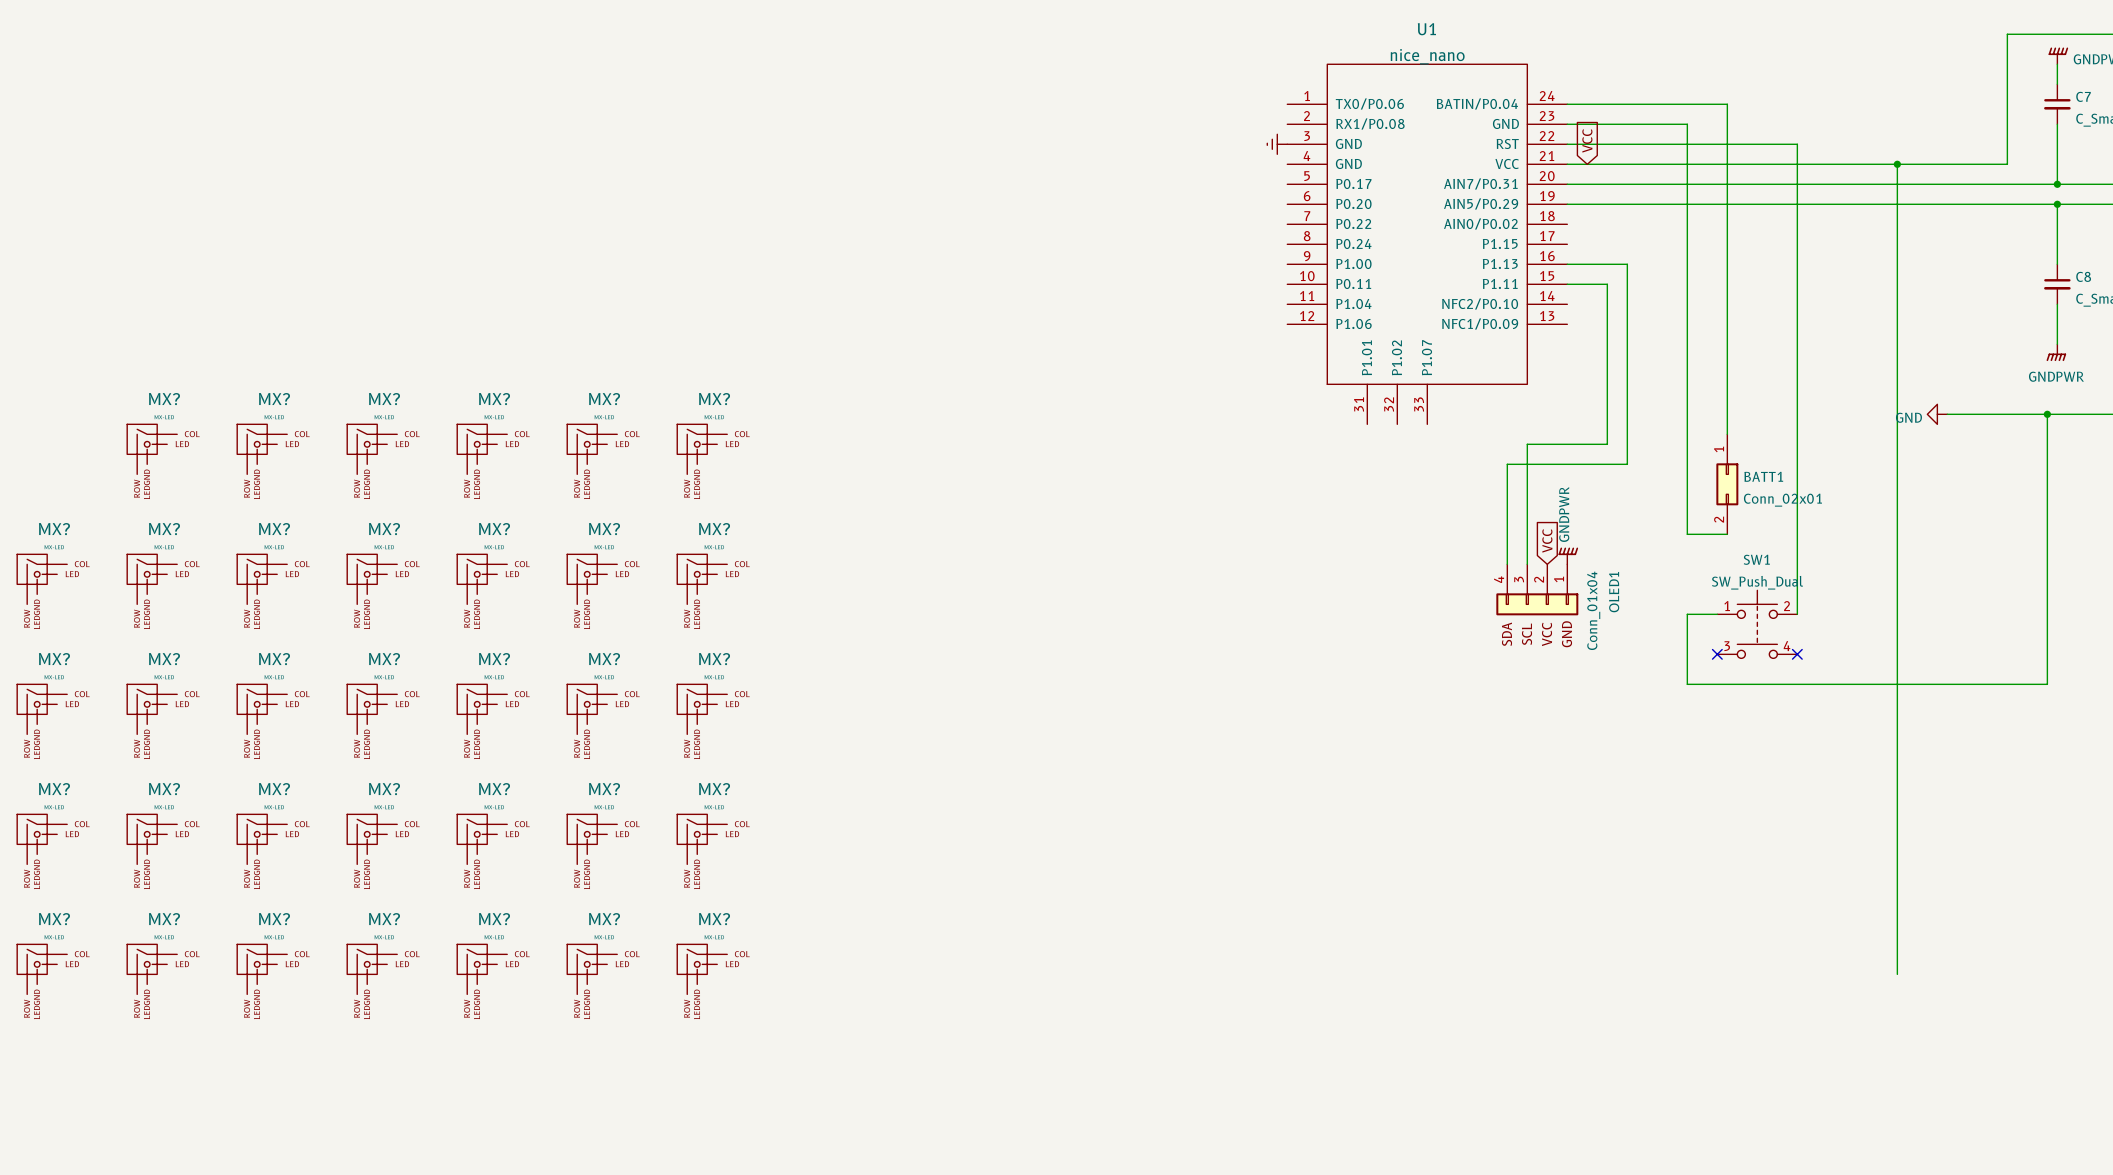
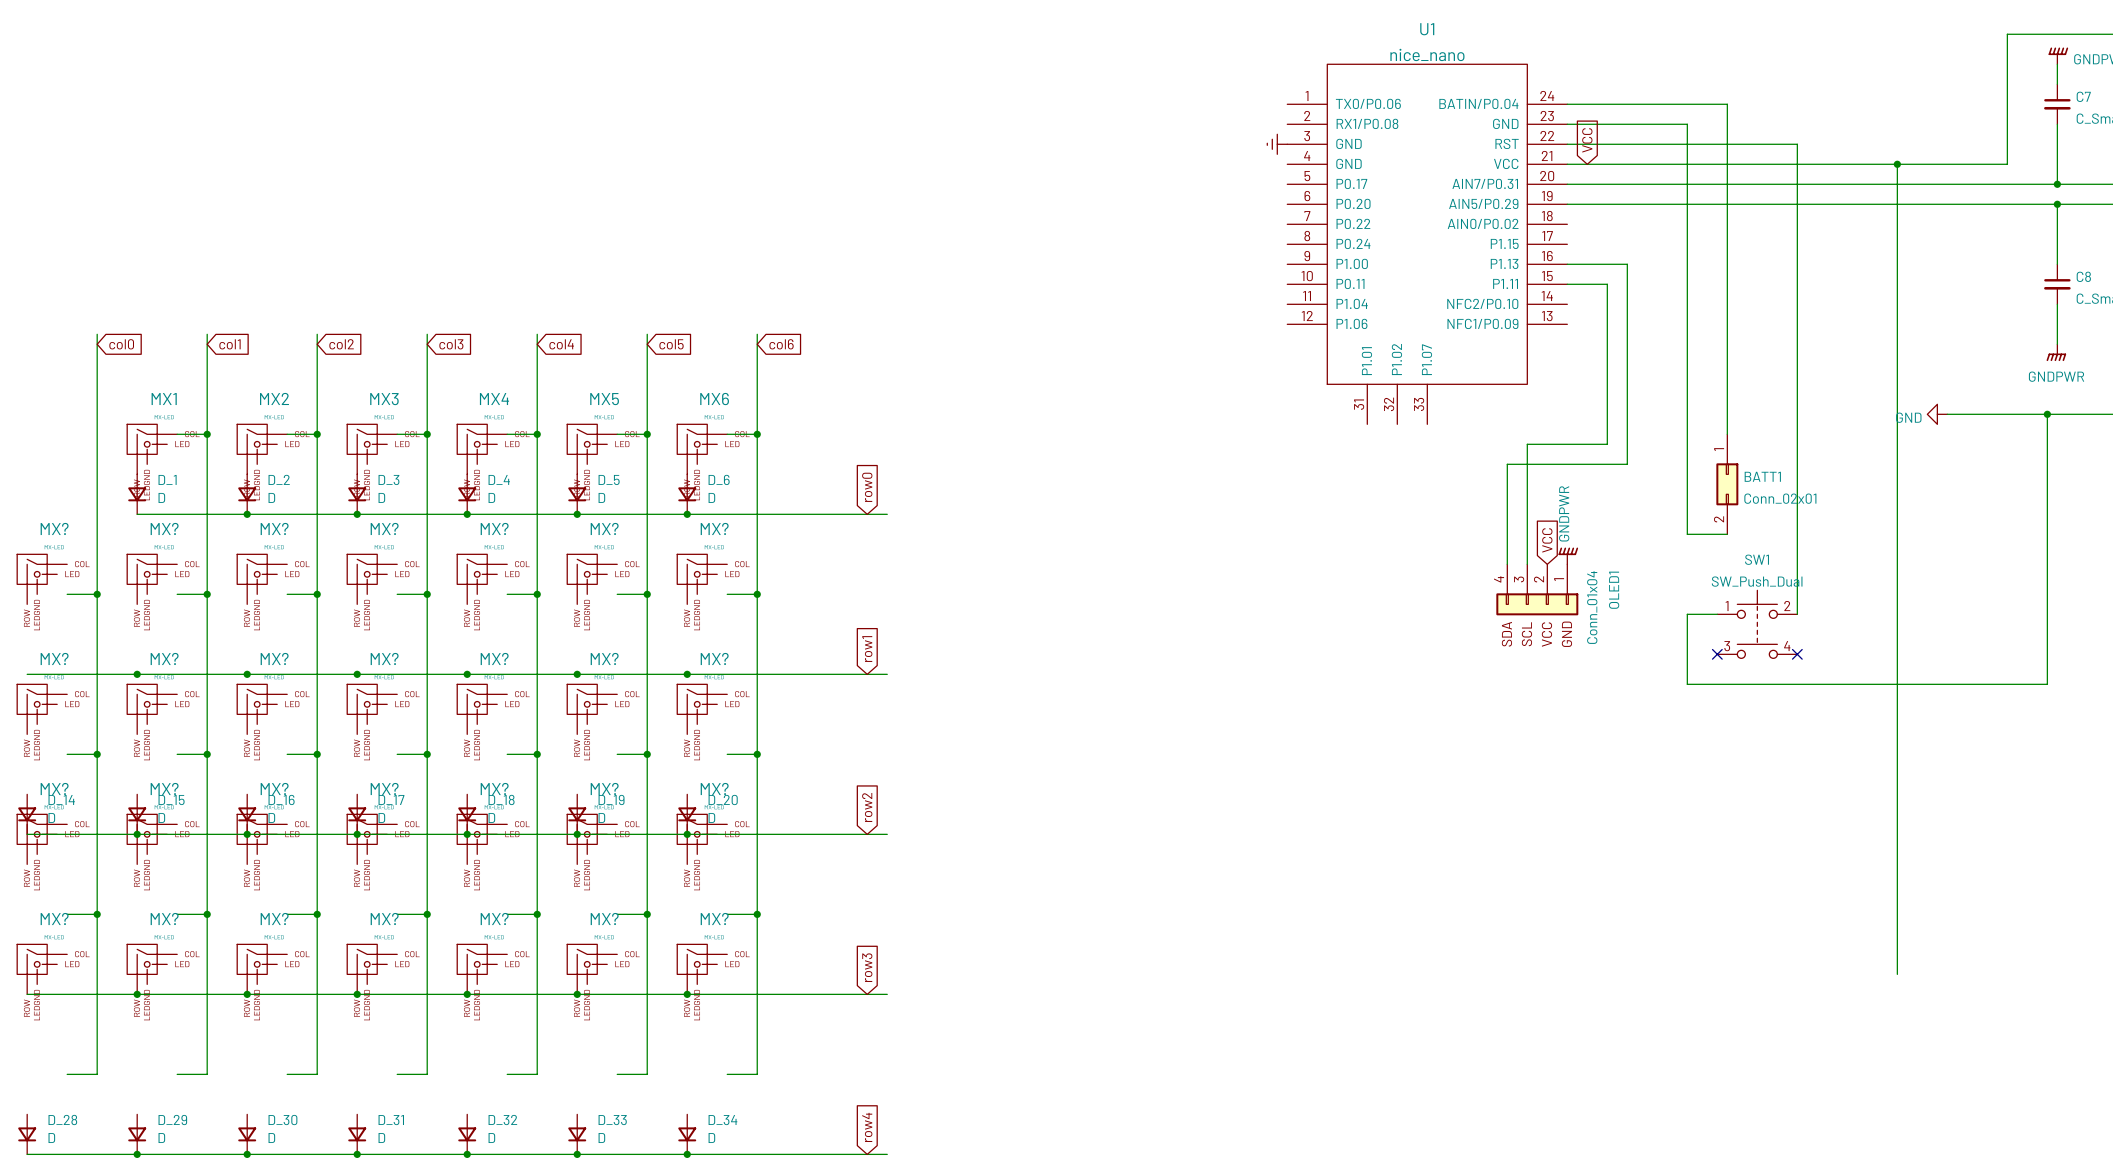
wire: none -> (97, 334) (97, 1074) (67, 1074)
wire: none -> (207, 334) (207, 1074) (177, 1074)
wire: none -> (317, 334) (317, 1074) (287, 1074)
wire: none -> (427, 334) (427, 1074) (397, 1074)
wire: none -> (537, 334) (537, 1074) (507, 1074)
wire: none -> (647, 334) (647, 1074) (617, 1074)
wire: none -> (757, 334) (757, 1074) (727, 1074)
global label: none -> col0 (121, 344)
global label: none -> col1 (229, 344)
global label: none -> col2 (341, 344)
global label: none -> col3 (451, 344)
global label: none -> col4 (561, 344)
global label: none -> col5 (671, 344)
global label: none -> col6 (781, 344)
MX? name: MX? (164, 399) -> MX1 (164, 399)
MX? name: MX? (274, 399) -> MX2 (274, 398)
MX? name: MX? (384, 399) -> MX3 (384, 399)
MX? name: MX? (494, 399) -> MX4 (494, 399)
MX? name: MX? (604, 399) -> MX5 (604, 399)
MX? name: MX? (714, 399) -> MX6 (714, 399)
wire: none -> (177, 434) (207, 434)
junction: none -> (207, 434)
wire: none -> (287, 434) (317, 434)
junction: none -> (317, 434)
wire: none -> (397, 434) (427, 434)
junction: none -> (427, 434)
wire: none -> (507, 434) (537, 434)
junction: none -> (537, 434)
wire: none -> (617, 434) (647, 434)
junction: none -> (647, 434)
wire: none -> (727, 434) (757, 434)
junction: none -> (757, 434)
global label: none -> row0 (867, 487)
D_1: none -> D (137, 494)
D_2: none -> D (247, 494)
D_3: none -> D (357, 494)
D_4: none -> D (467, 494)
D_5: none -> D (577, 494)
D_6: none -> D (687, 494)
wire: none -> (137, 514) (887, 514)
junction: none -> (247, 514)
junction: none -> (357, 514)
junction: none -> (467, 514)
junction: none -> (577, 514)
junction: none -> (687, 514)
wire: none -> (67, 594) (97, 594)
junction: none -> (97, 594)
wire: none -> (177, 594) (207, 594)
junction: none -> (207, 594)
wire: none -> (287, 594) (317, 594)
junction: none -> (317, 594)
wire: none -> (397, 594) (427, 594)
junction: none -> (427, 594)
wire: none -> (507, 594) (537, 594)
junction: none -> (537, 594)
wire: none -> (617, 594) (647, 594)
junction: none -> (647, 594)
wire: none -> (727, 594) (757, 594)
junction: none -> (757, 594)
global label: none -> row1 (867, 649)
wire: none -> (27, 674) (887, 674)
junction: none -> (137, 674)
junction: none -> (247, 674)
junction: none -> (357, 674)
junction: none -> (467, 674)
junction: none -> (577, 674)
junction: none -> (687, 674)
wire: none -> (67, 754) (97, 754)
junction: none -> (97, 754)
wire: none -> (177, 754) (207, 754)
junction: none -> (207, 754)
wire: none -> (287, 754) (317, 754)
junction: none -> (317, 754)
wire: none -> (397, 754) (427, 754)
junction: none -> (427, 754)
wire: none -> (507, 754) (537, 754)
junction: none -> (537, 754)
wire: none -> (617, 754) (647, 754)
junction: none -> (647, 754)
wire: none -> (727, 754) (757, 754)
junction: none -> (757, 754)
global label: none -> row2 (867, 807)
D_14: none -> D (27, 814)
D_15: none -> D (137, 814)
D_16: none -> D (247, 814)
D_17: none -> D (357, 814)
D_18: none -> D (467, 814)
D_19: none -> D (577, 814)
D_20: none -> D (687, 814)
wire: none -> (27, 834) (887, 834)
junction: none -> (137, 834)
junction: none -> (247, 834)
junction: none -> (357, 834)
junction: none -> (467, 834)
junction: none -> (577, 834)
junction: none -> (687, 834)
wire: none -> (67, 914) (97, 914)
junction: none -> (97, 914)
wire: none -> (177, 914) (207, 914)
junction: none -> (207, 914)
wire: none -> (287, 914) (317, 914)
junction: none -> (317, 914)
wire: none -> (397, 914) (427, 914)
junction: none -> (427, 914)
wire: none -> (507, 914) (537, 914)
junction: none -> (537, 914)
wire: none -> (617, 914) (647, 914)
junction: none -> (647, 914)
wire: none -> (727, 914) (757, 914)
junction: none -> (757, 914)
global label: none -> row3 (867, 967)
wire: none -> (27, 994) (887, 994)
junction: none -> (137, 994)
junction: none -> (247, 994)
junction: none -> (357, 994)
junction: none -> (467, 994)
junction: none -> (577, 994)
junction: none -> (687, 994)
global label: none -> row4 (867, 1127)
D_28: none -> D (27, 1134)
D_29: none -> D (137, 1134)
D_30: none -> D (247, 1134)
D_31: none -> D (357, 1134)
D_32: none -> D (467, 1134)
D_33: none -> D (577, 1134)
D_34: none -> D (687, 1134)
wire: none -> (27, 1154) (887, 1154)
junction: none -> (137, 1154)
junction: none -> (247, 1154)
junction: none -> (357, 1154)
junction: none -> (467, 1154)
junction: none -> (577, 1154)
junction: none -> (687, 1154)

